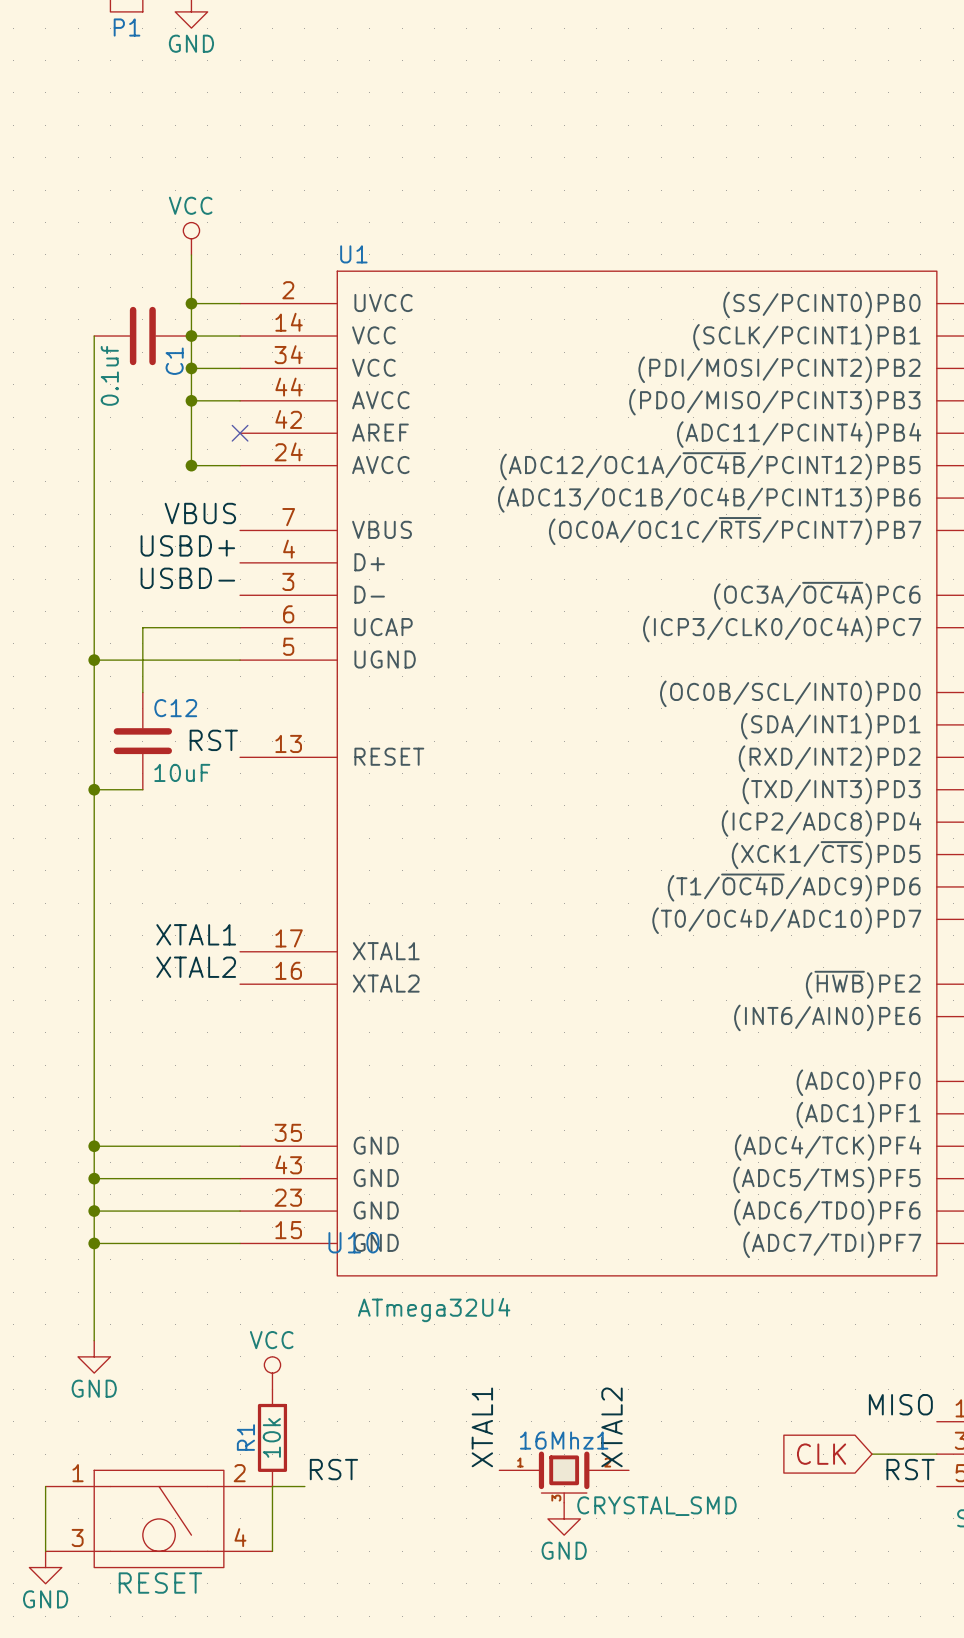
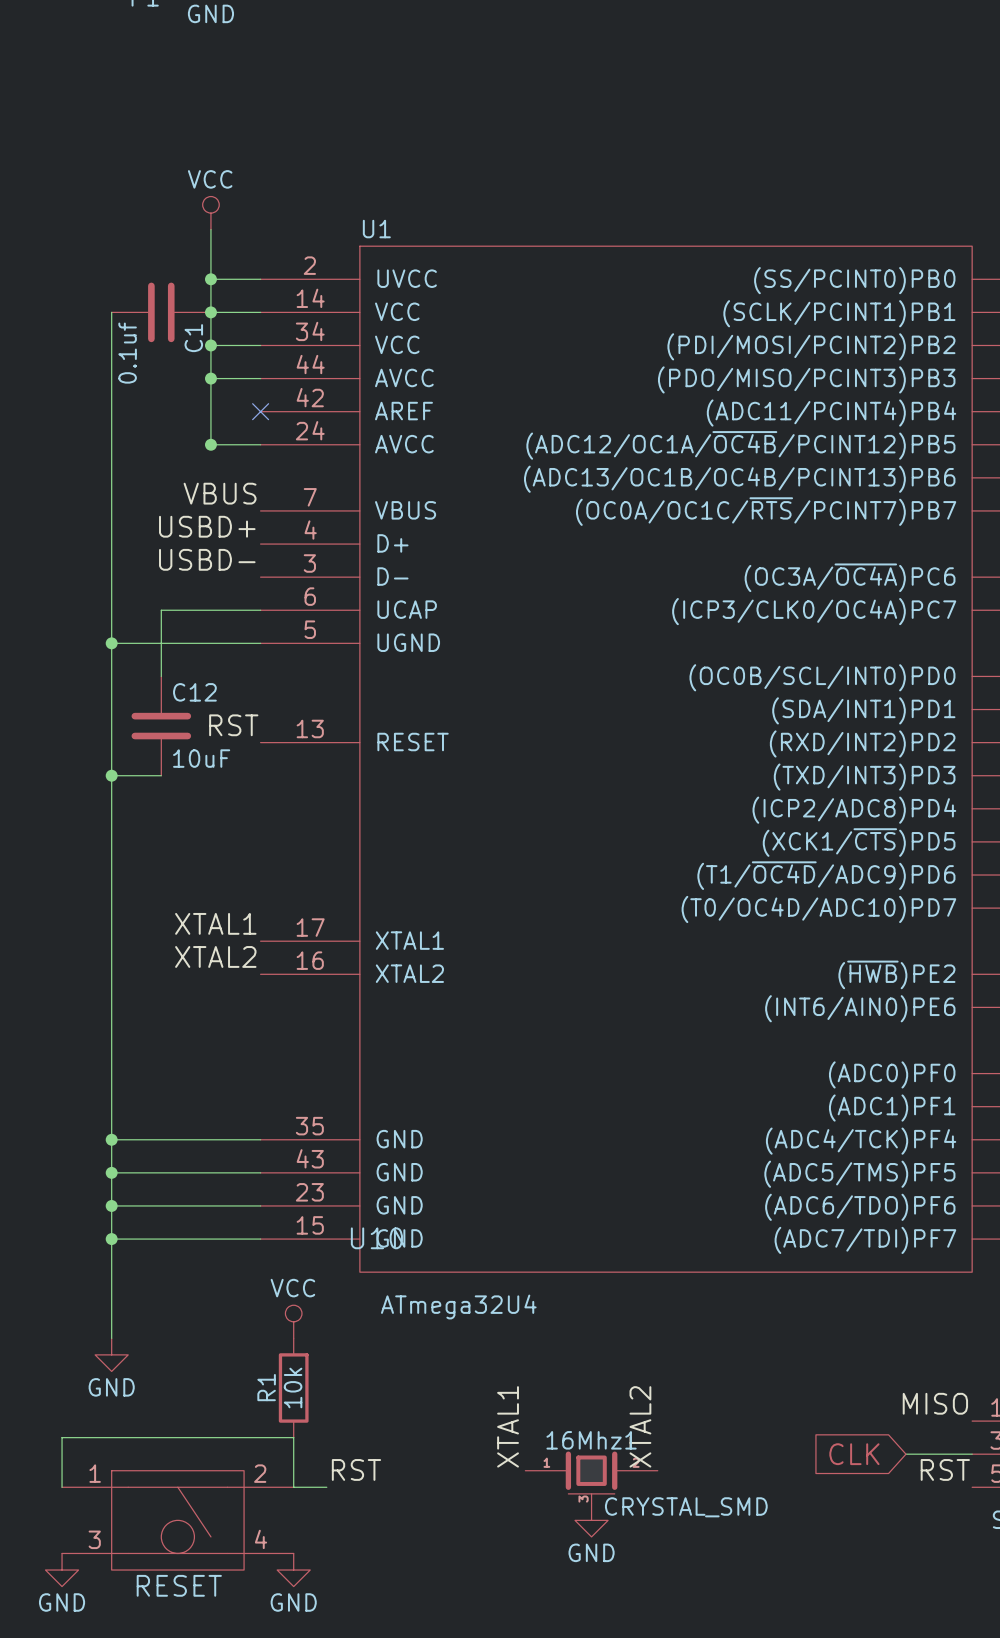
power symbol position: VCC (272, 1373) -> VCC (293, 1321)
R1 position: (272, 1437) -> (293, 1387)
wire: (45, 1486) (45, 1551) -> (62, 1487) (62, 1437) (293, 1437) (293, 1487)
wire: (272, 1486) (272, 1551) -> none
power symbol: none -> GND (293, 1570)

